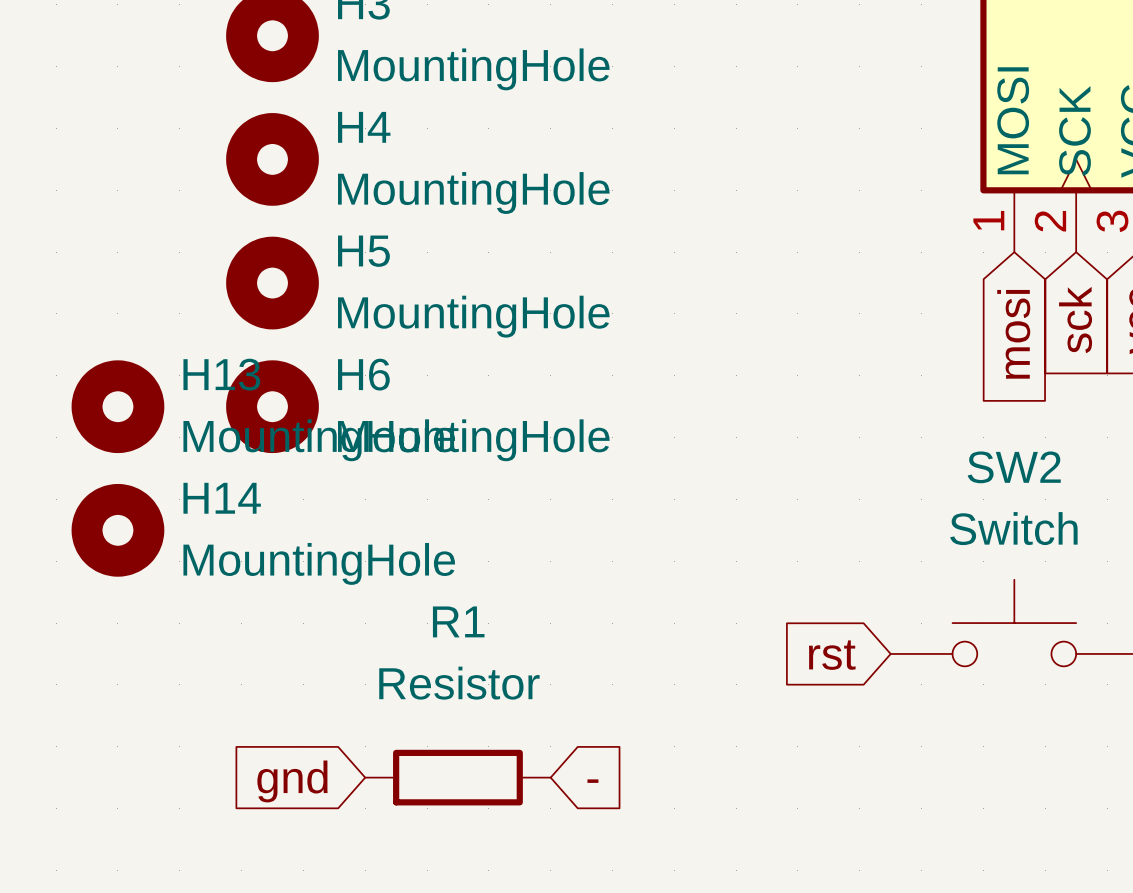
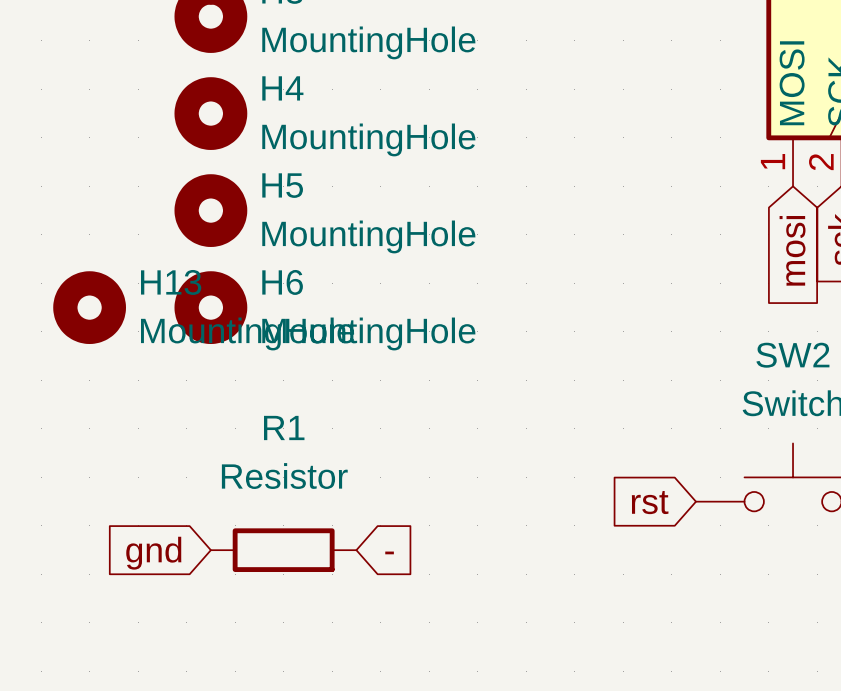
H14: MountingHole (117, 530) -> none
R1 position: (457, 777) -> (283, 550)
global label position: gnd (292, 781) -> gnd (153, 553)
global label position: - (592, 781) -> - (389, 552)

